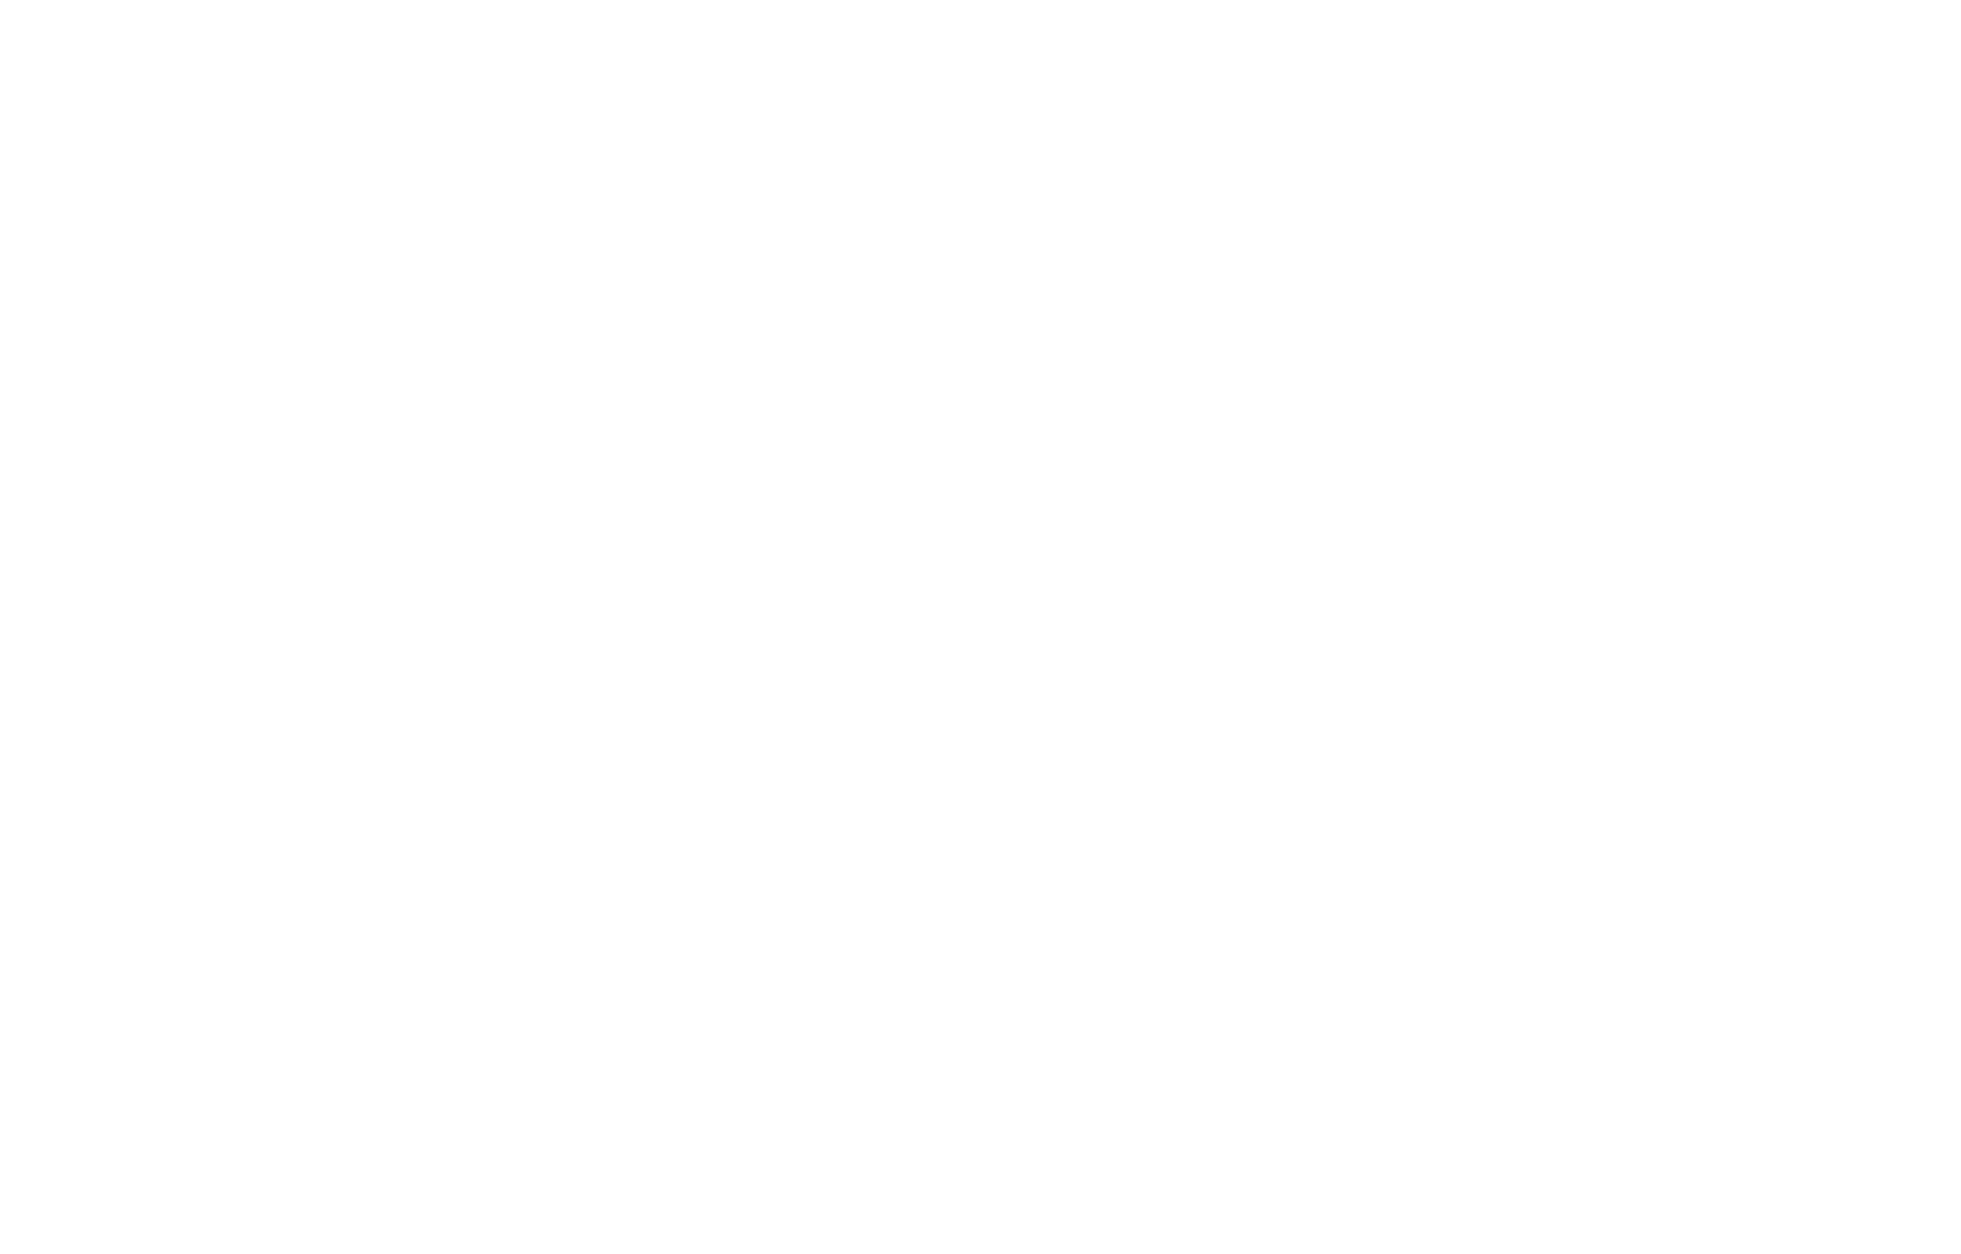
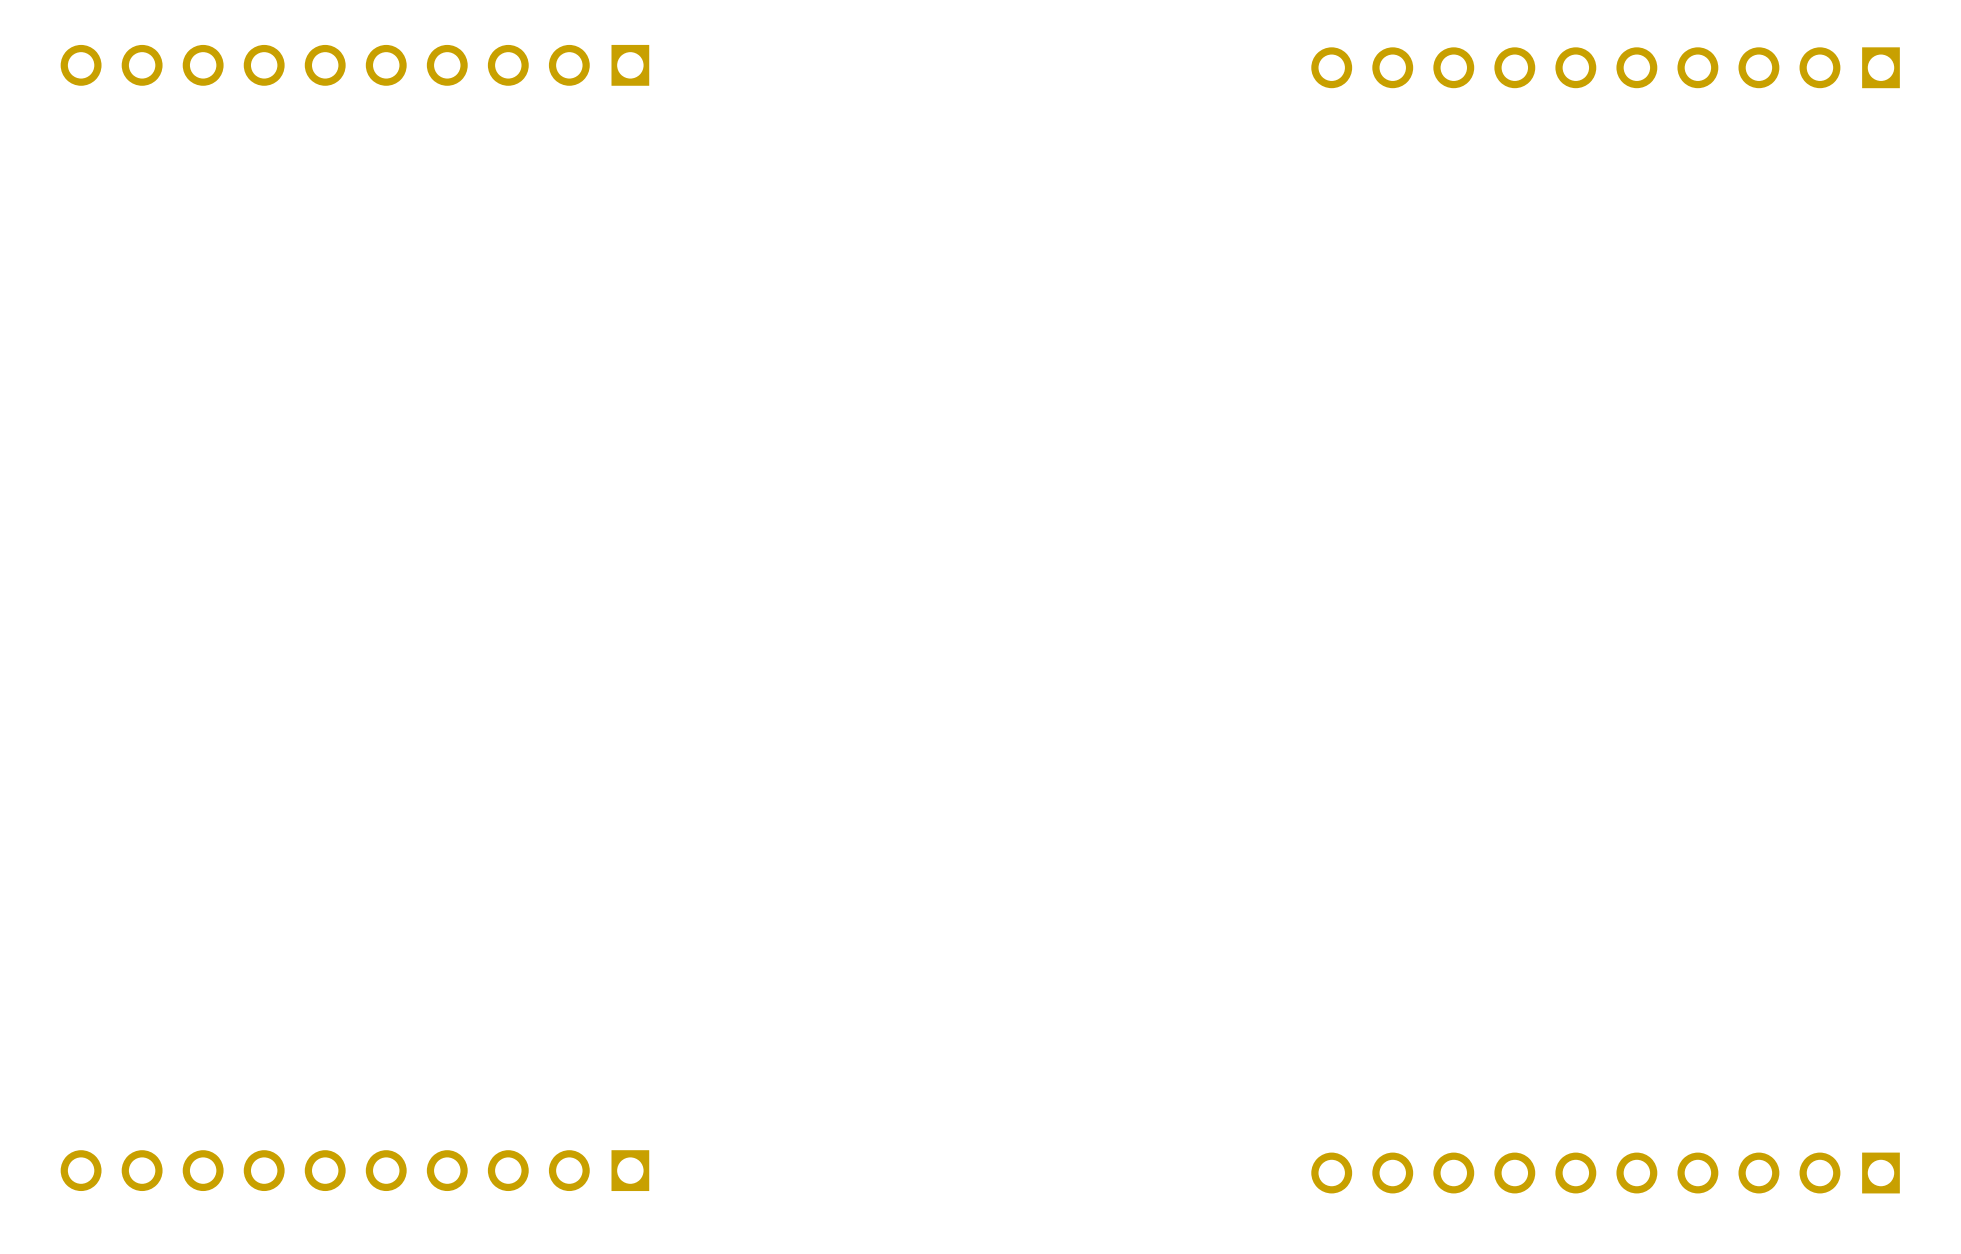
part: none -> (354, 65)
part: none -> (1605, 67)
part: none -> (354, 1170)
part: none -> (1605, 1173)

